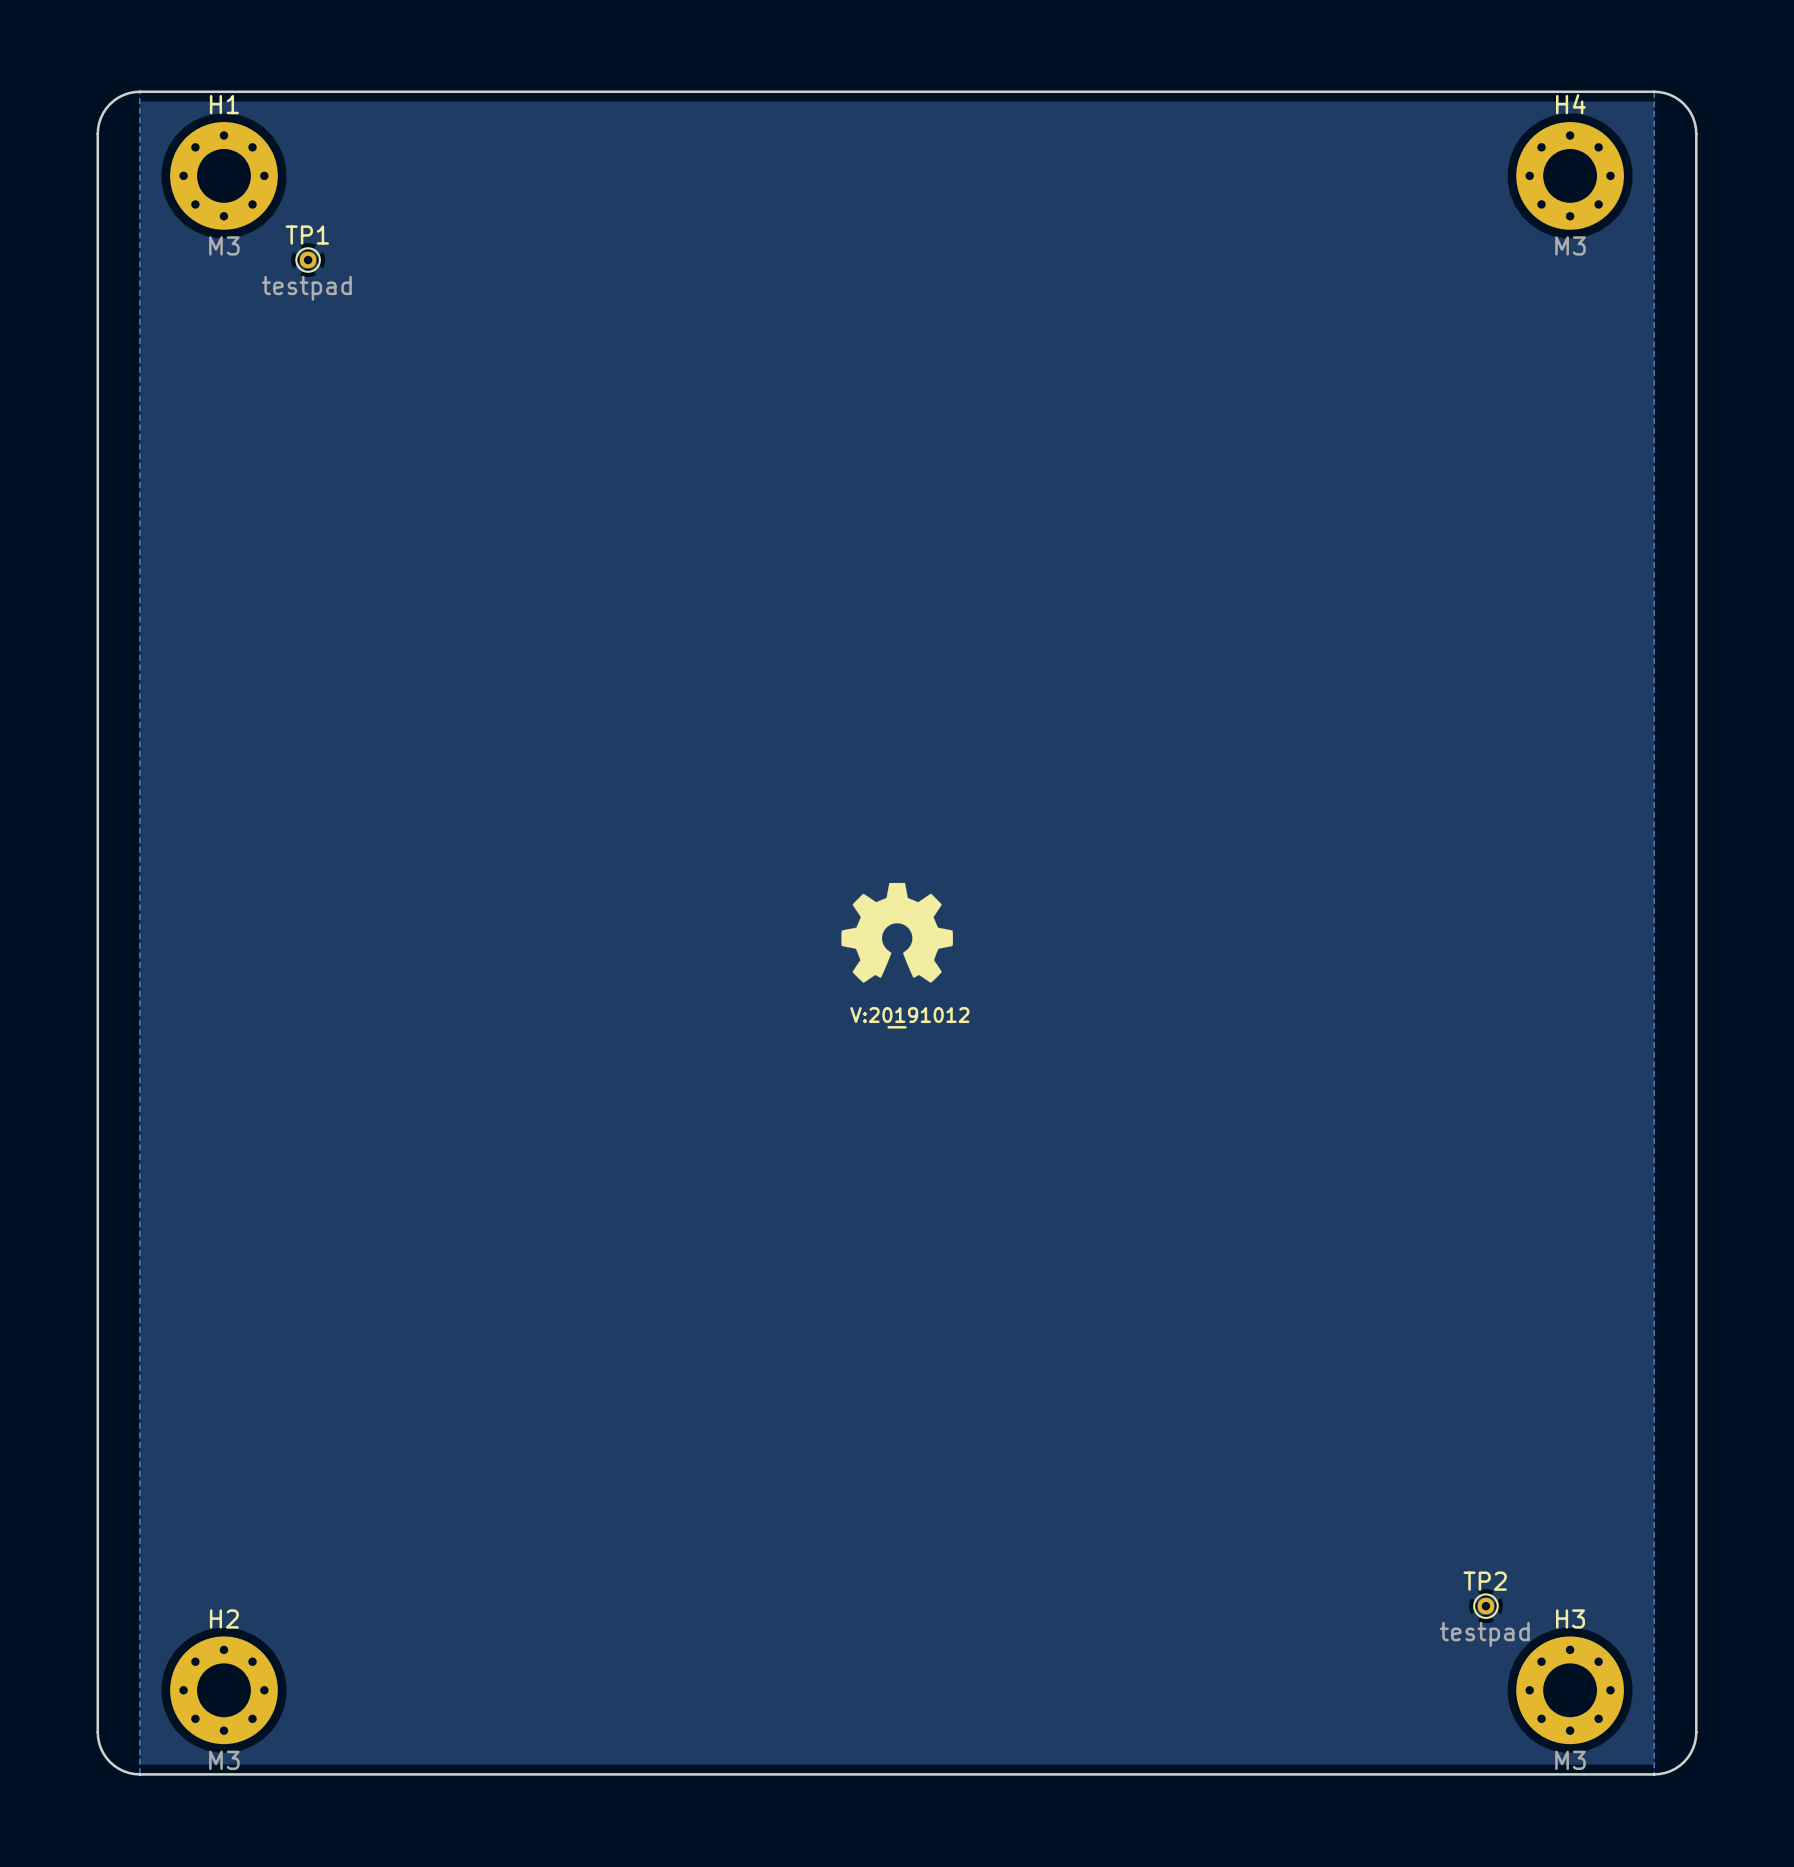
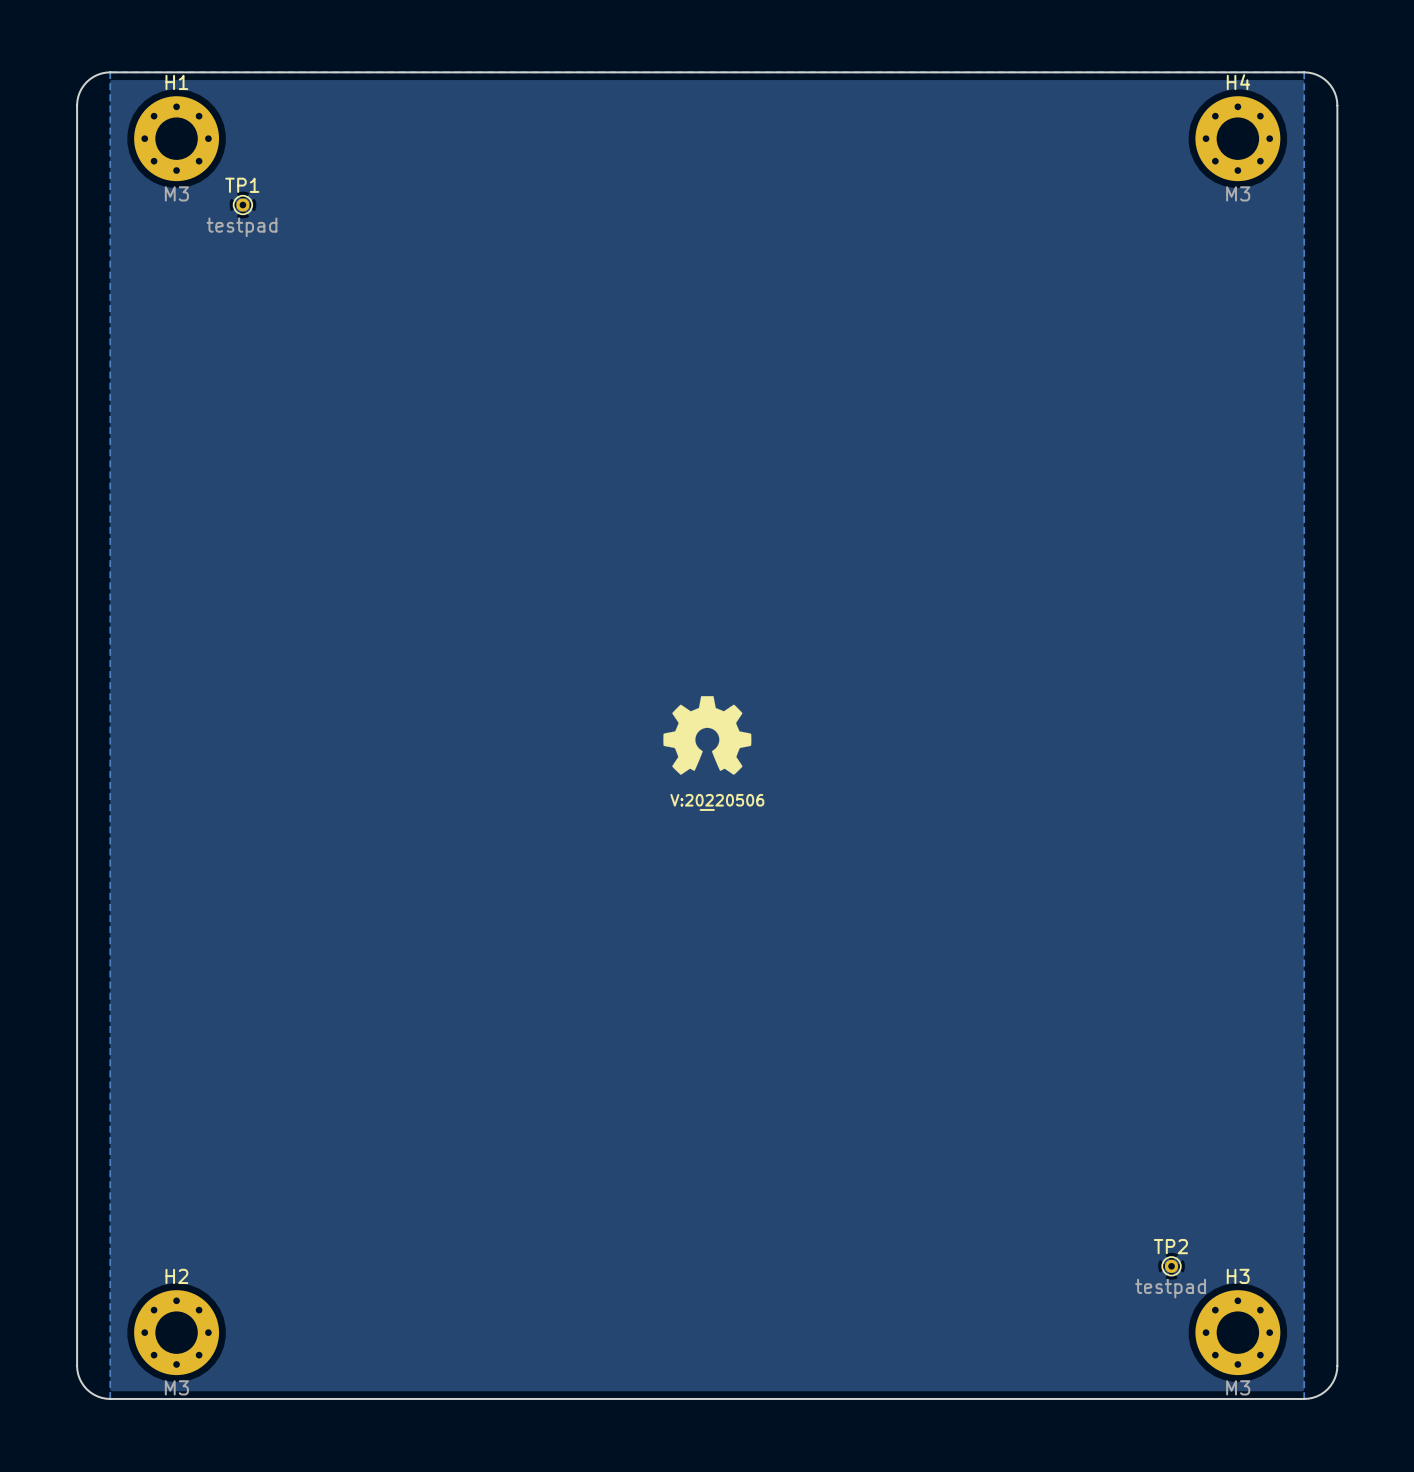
drawing shape: [850, 1007, 970, 1029] -> [670, 793, 765, 811]

